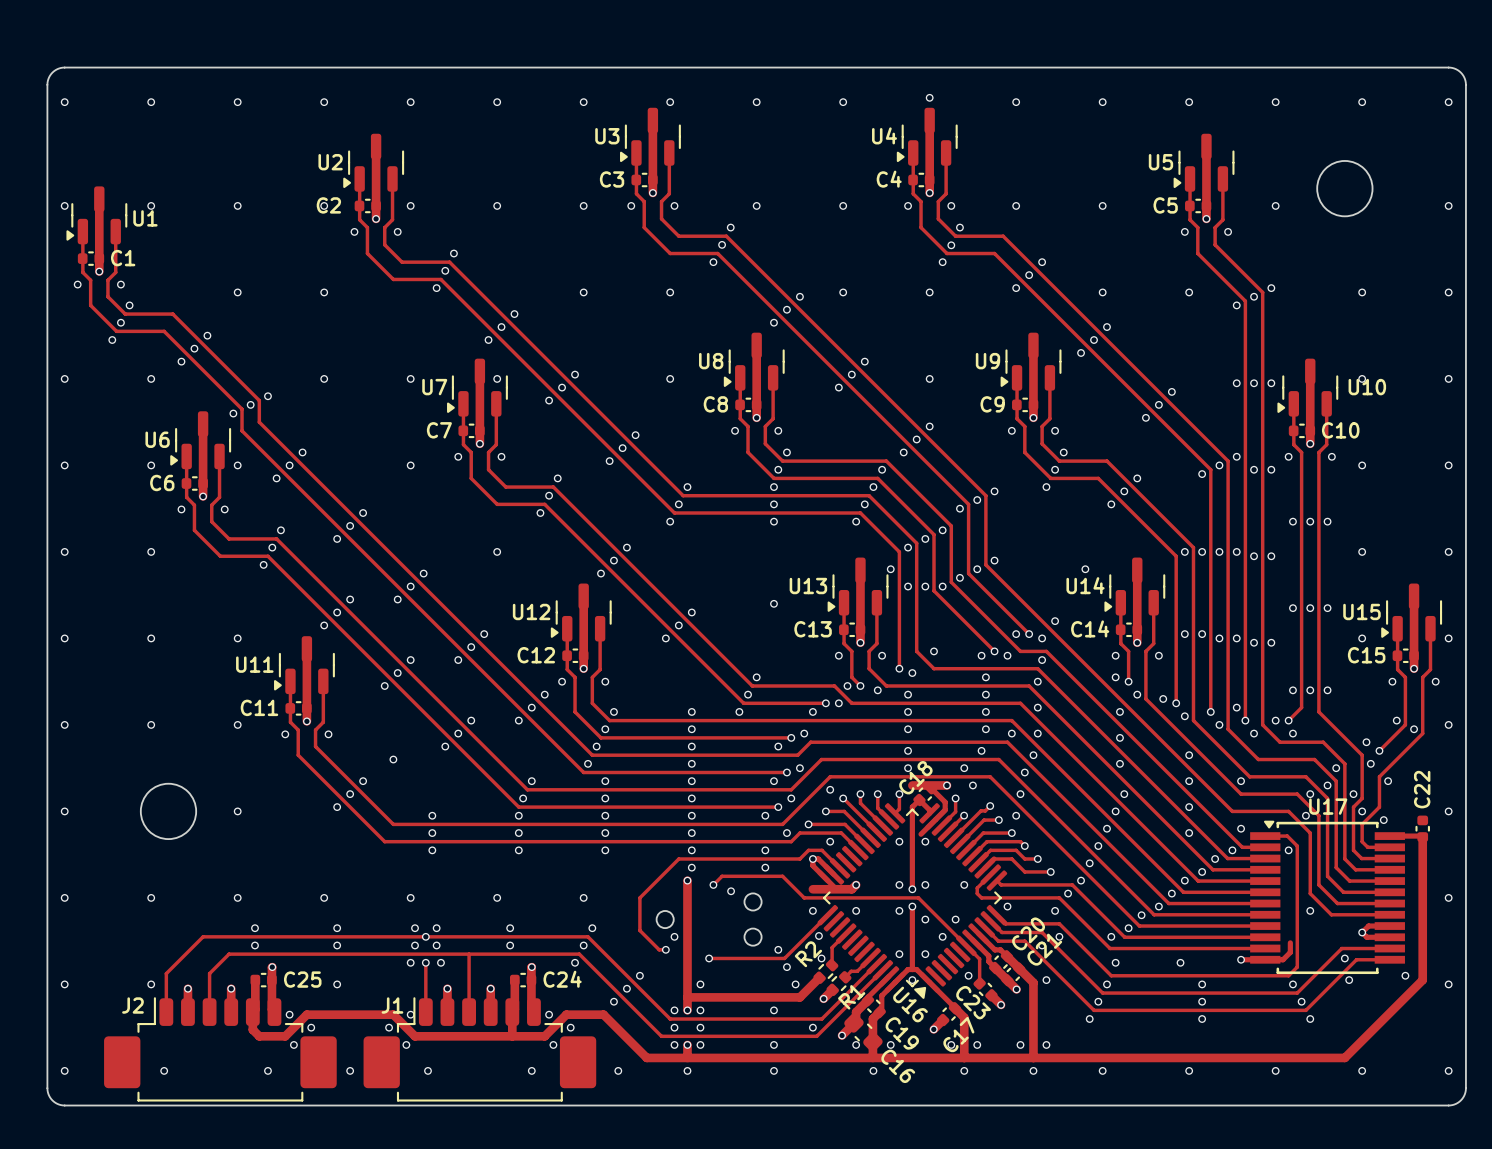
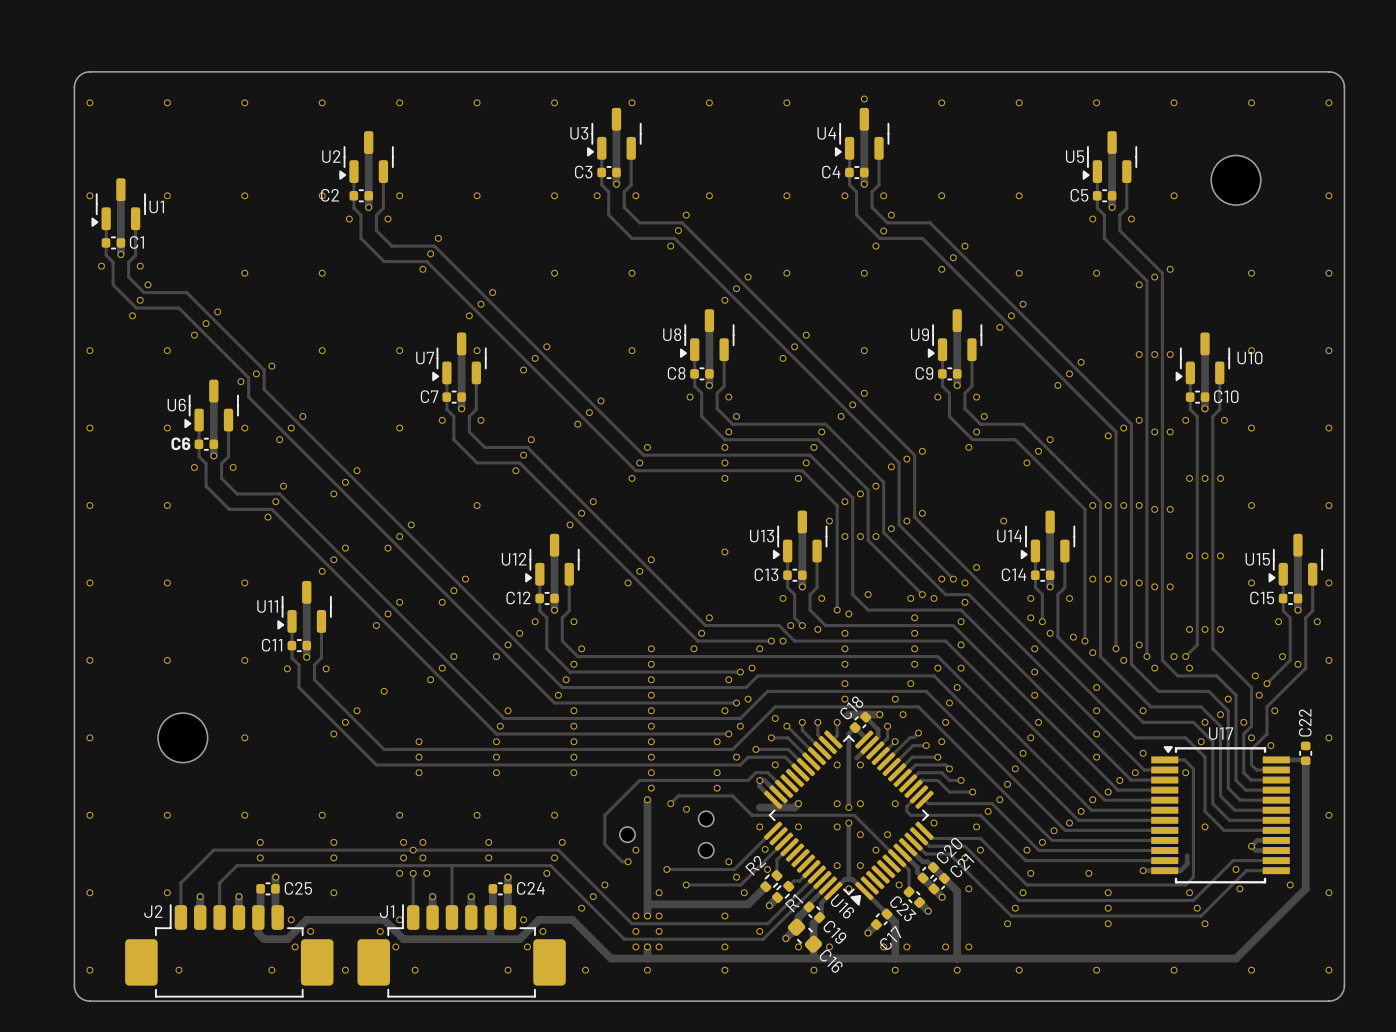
track: none -> (784, 841) (740, 884) (686, 884)
via: none -> (686, 884)

